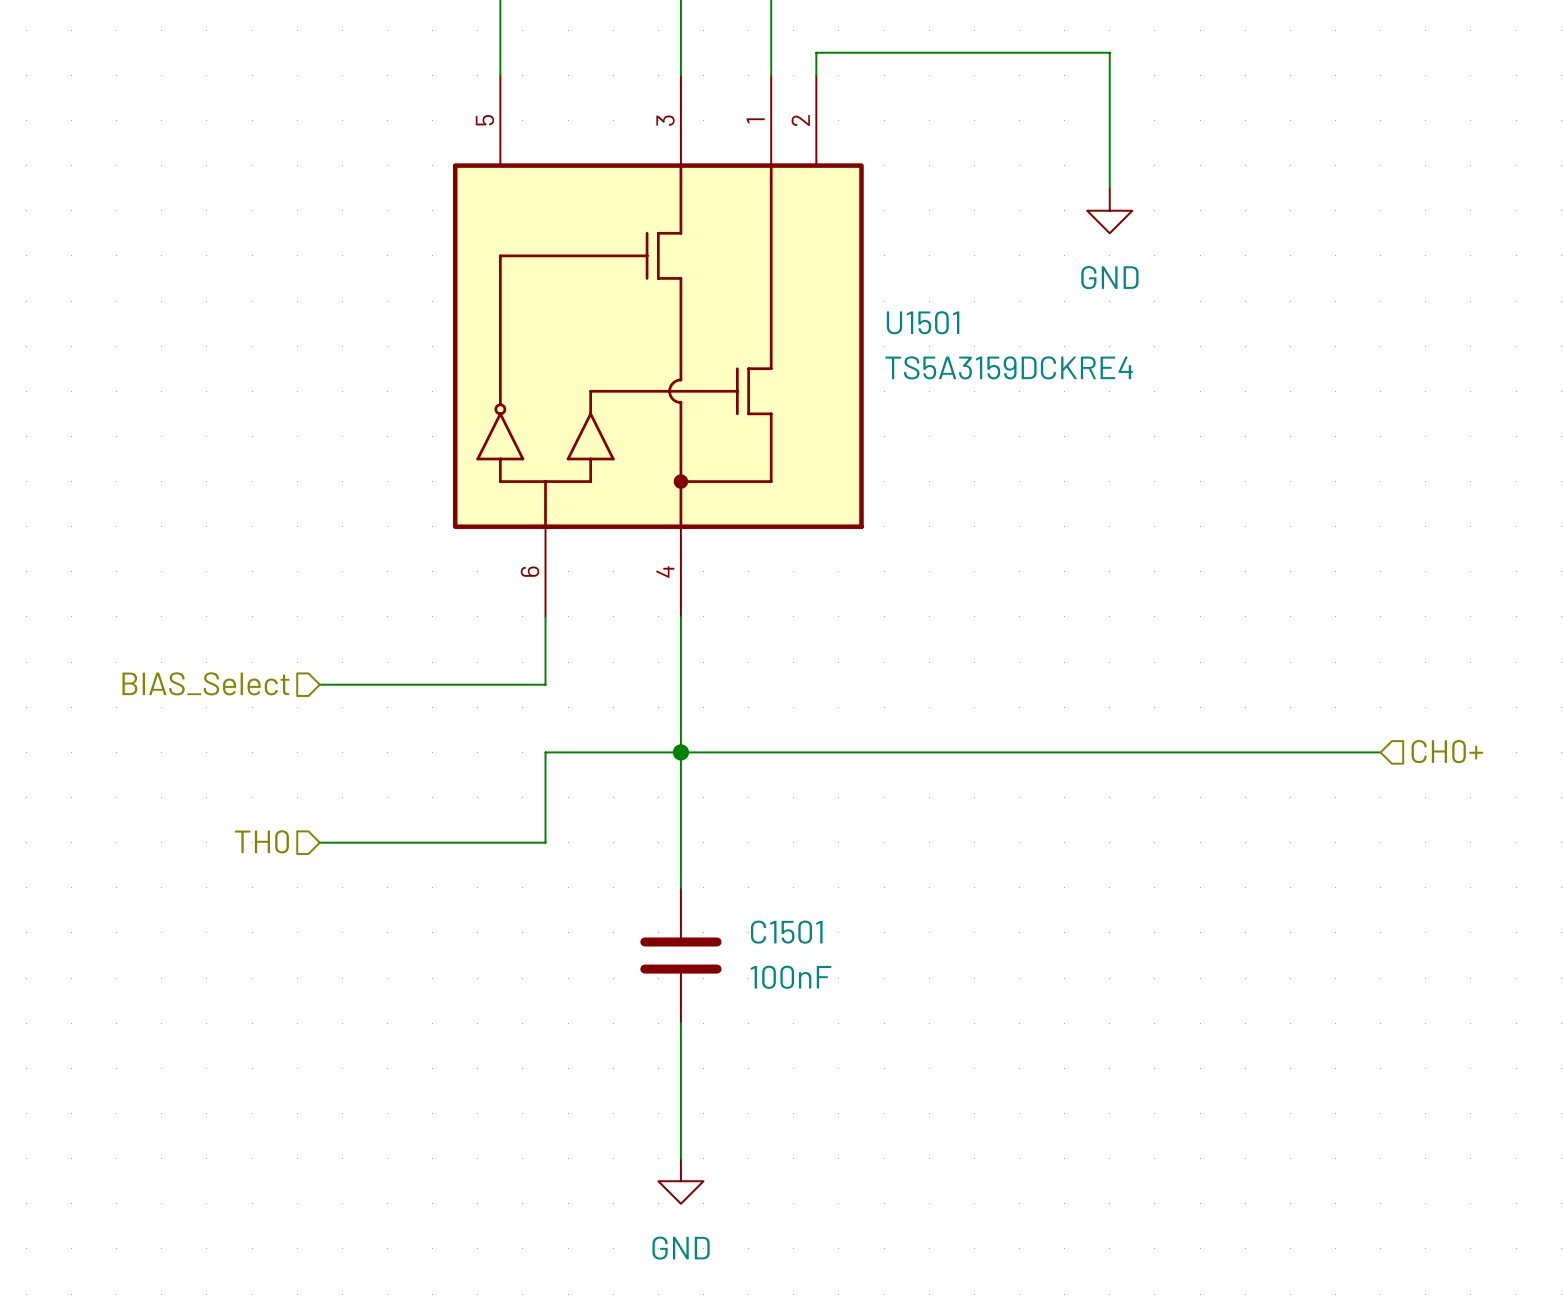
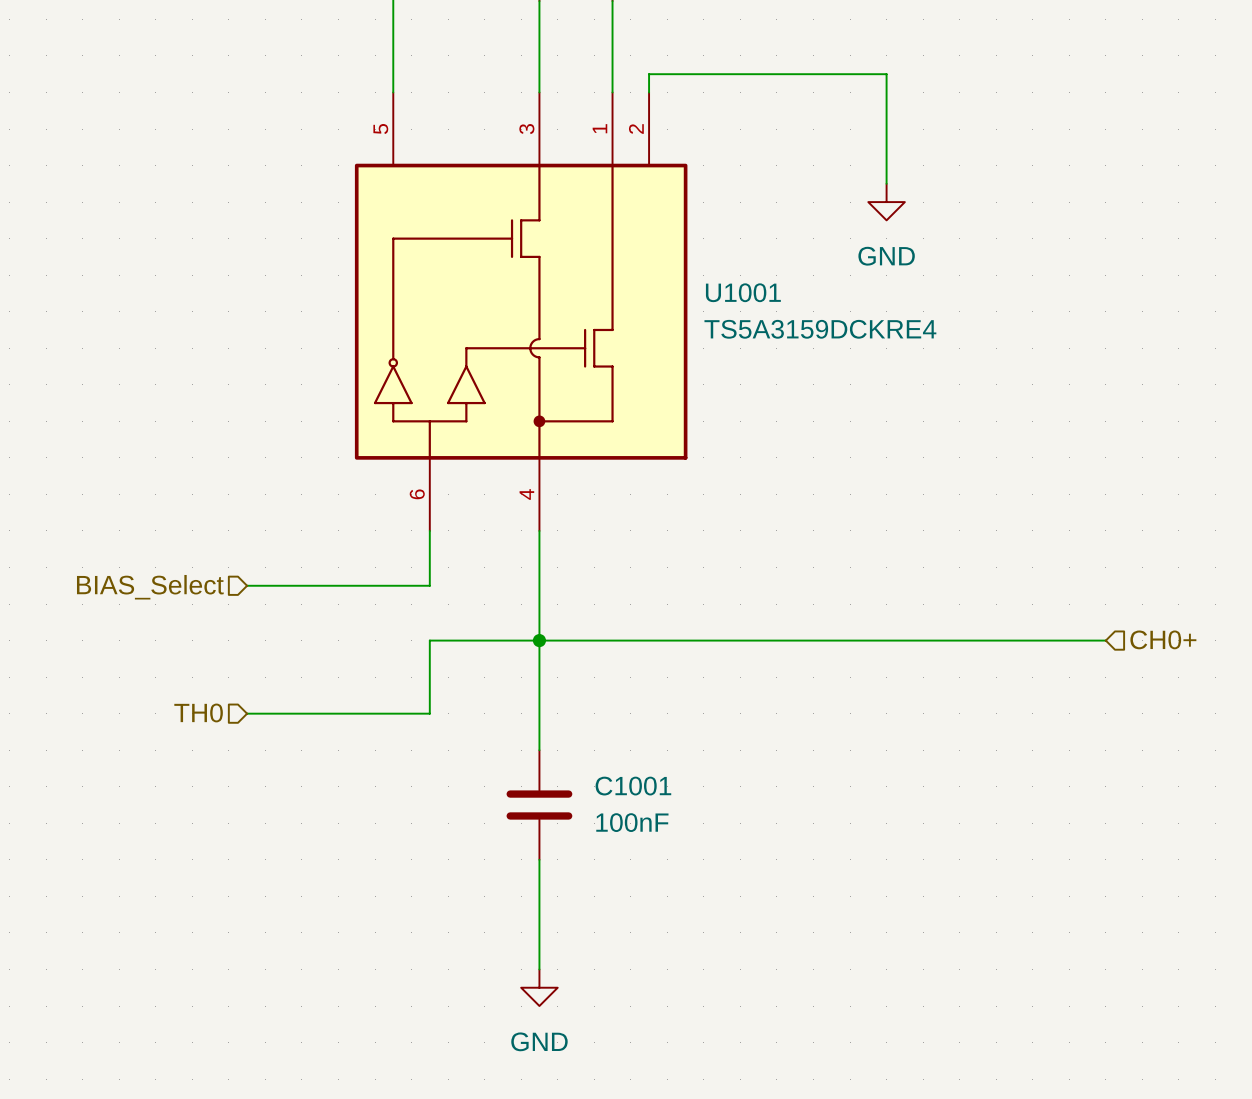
U1501 name: U1501 (923, 322) -> U1001 (743, 292)
C1501 name: C1501 (786, 932) -> C1001 (633, 786)

